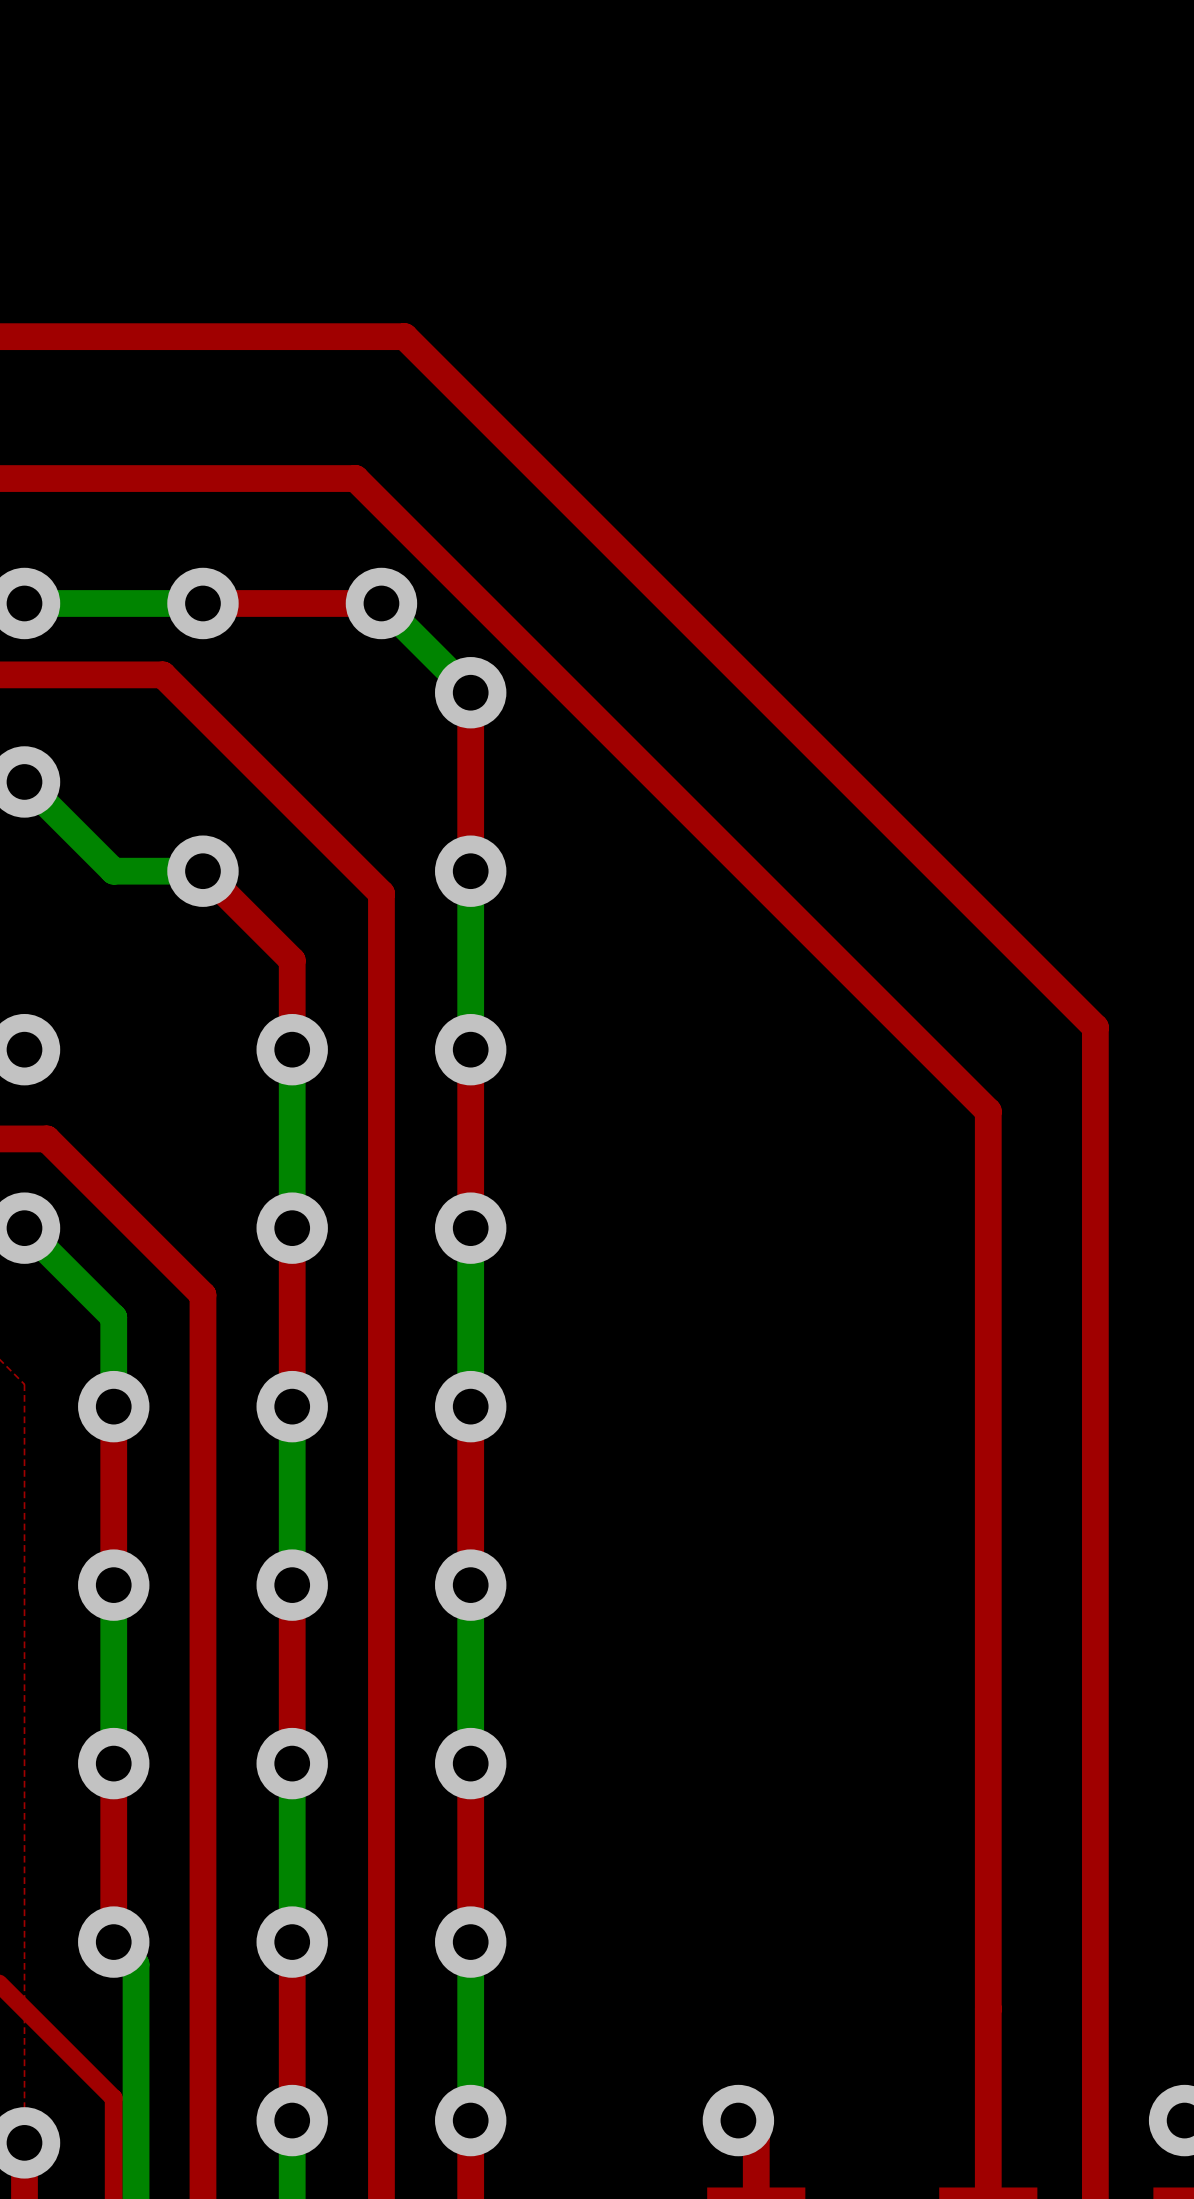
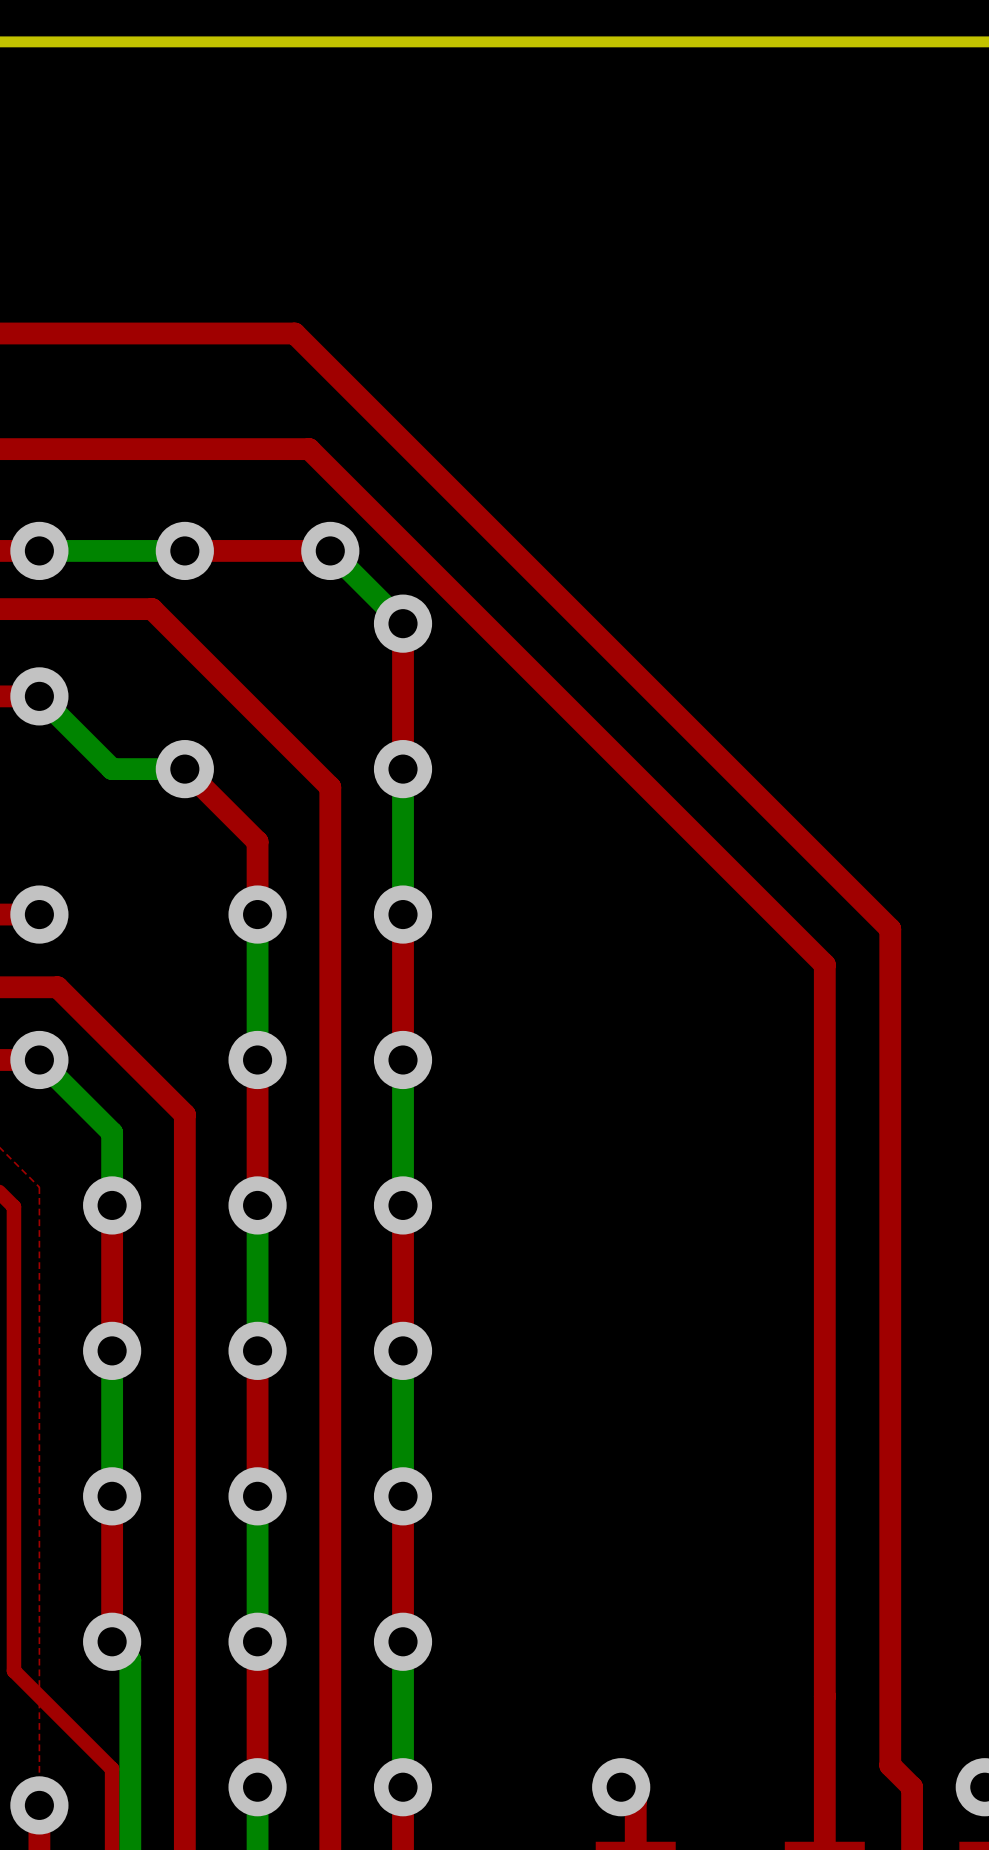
top track: (337, 336) (404, 336) (1095, 1027) (1095, 2120) -> (294, 333) (890, 929) (890, 1765) (912, 1787)

